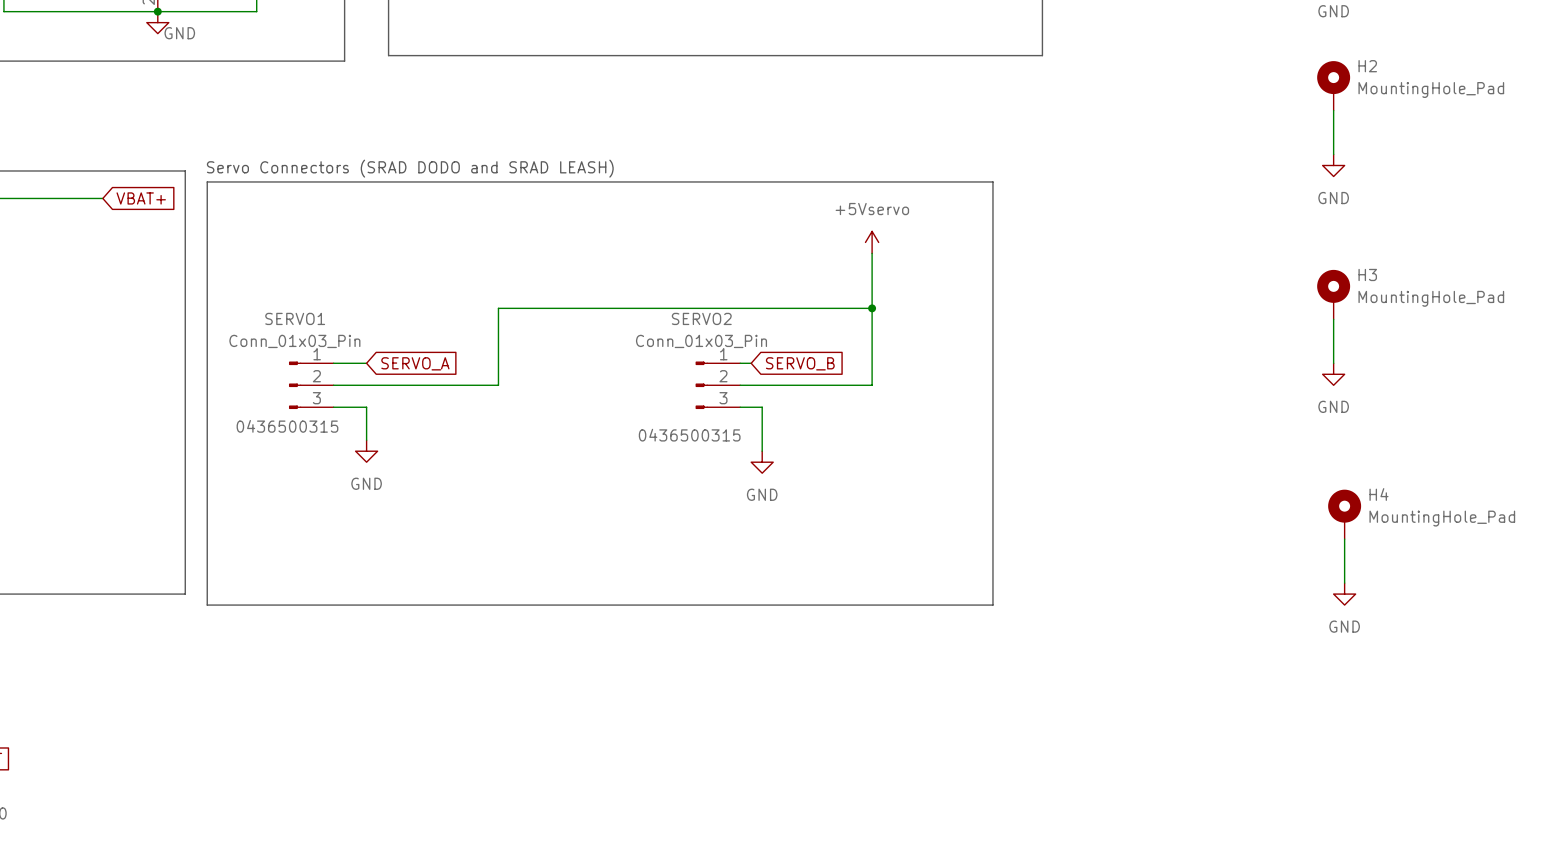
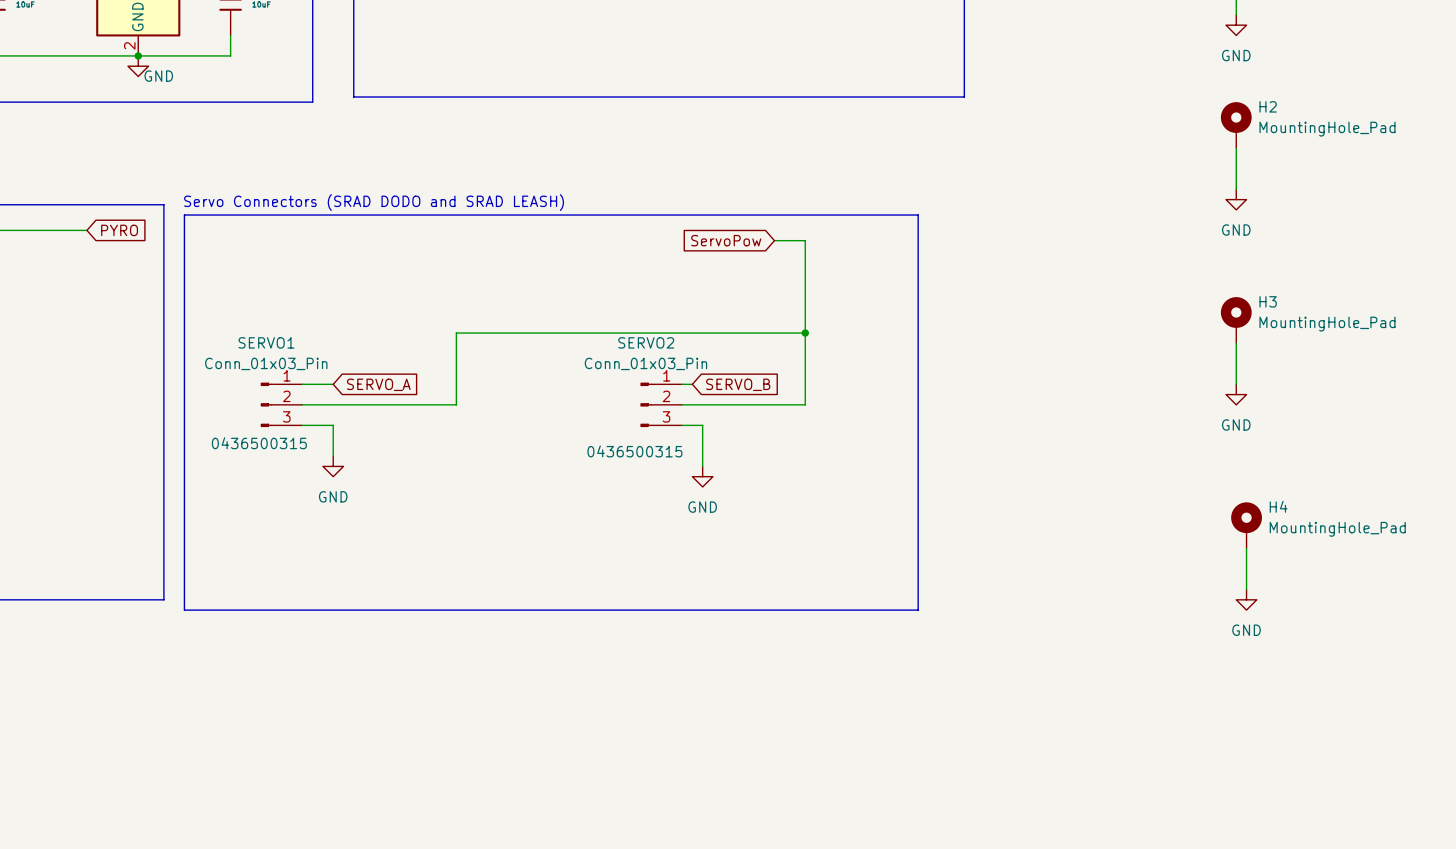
global label: VBAT+ (141, 198) -> PYRO (119, 230)
global label: none -> ServoPow (726, 240)
wire: none -> (774, 240) (805, 240) (805, 281)
power symbol: +5Vservo (872, 242) -> none

